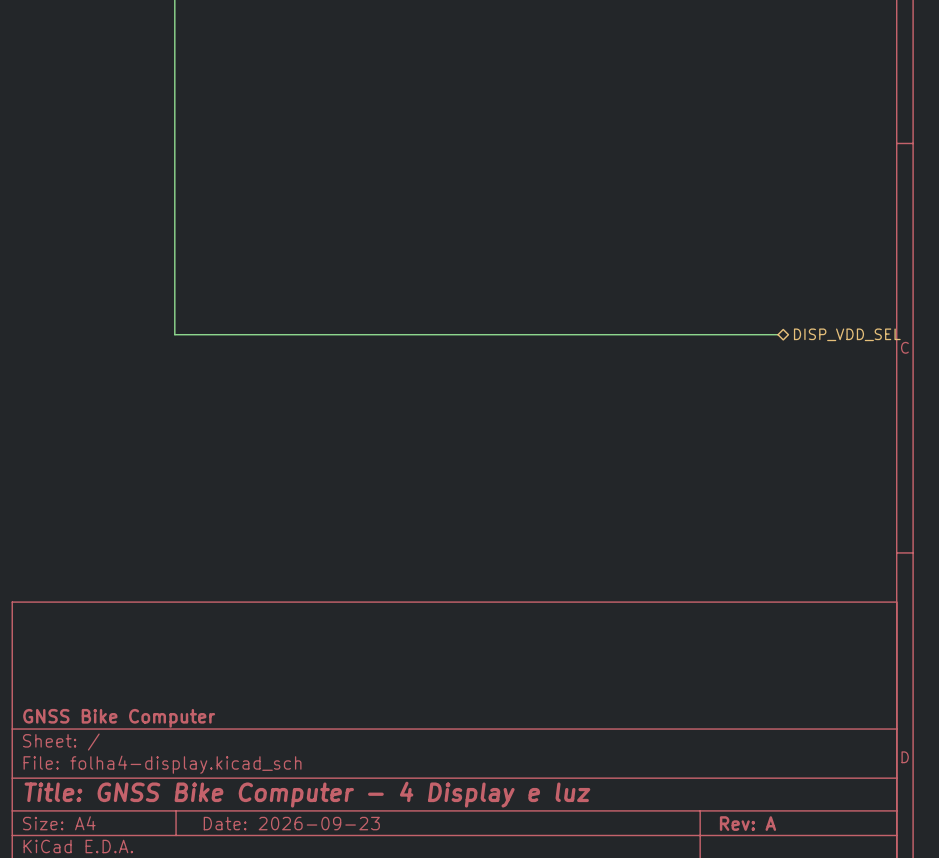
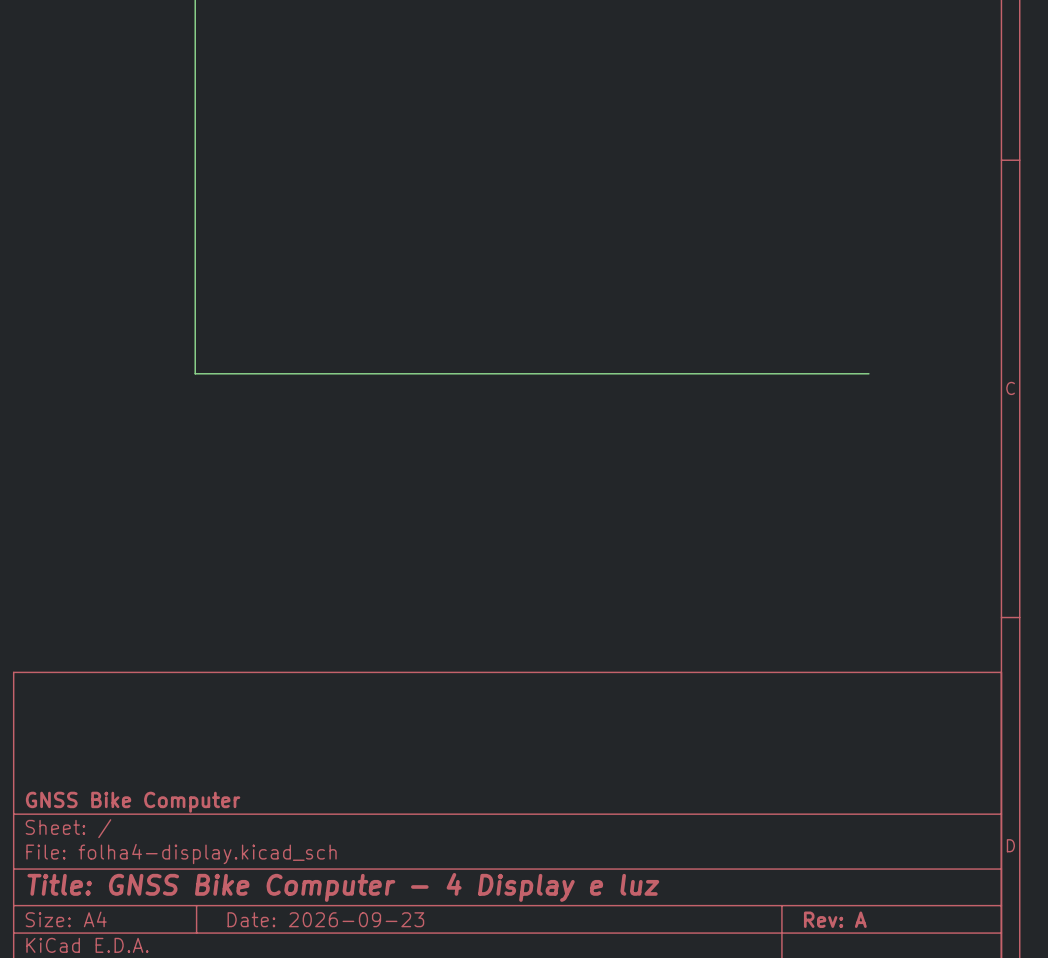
hierarchical label: DISP_VDD_SEL (847, 334) -> none

